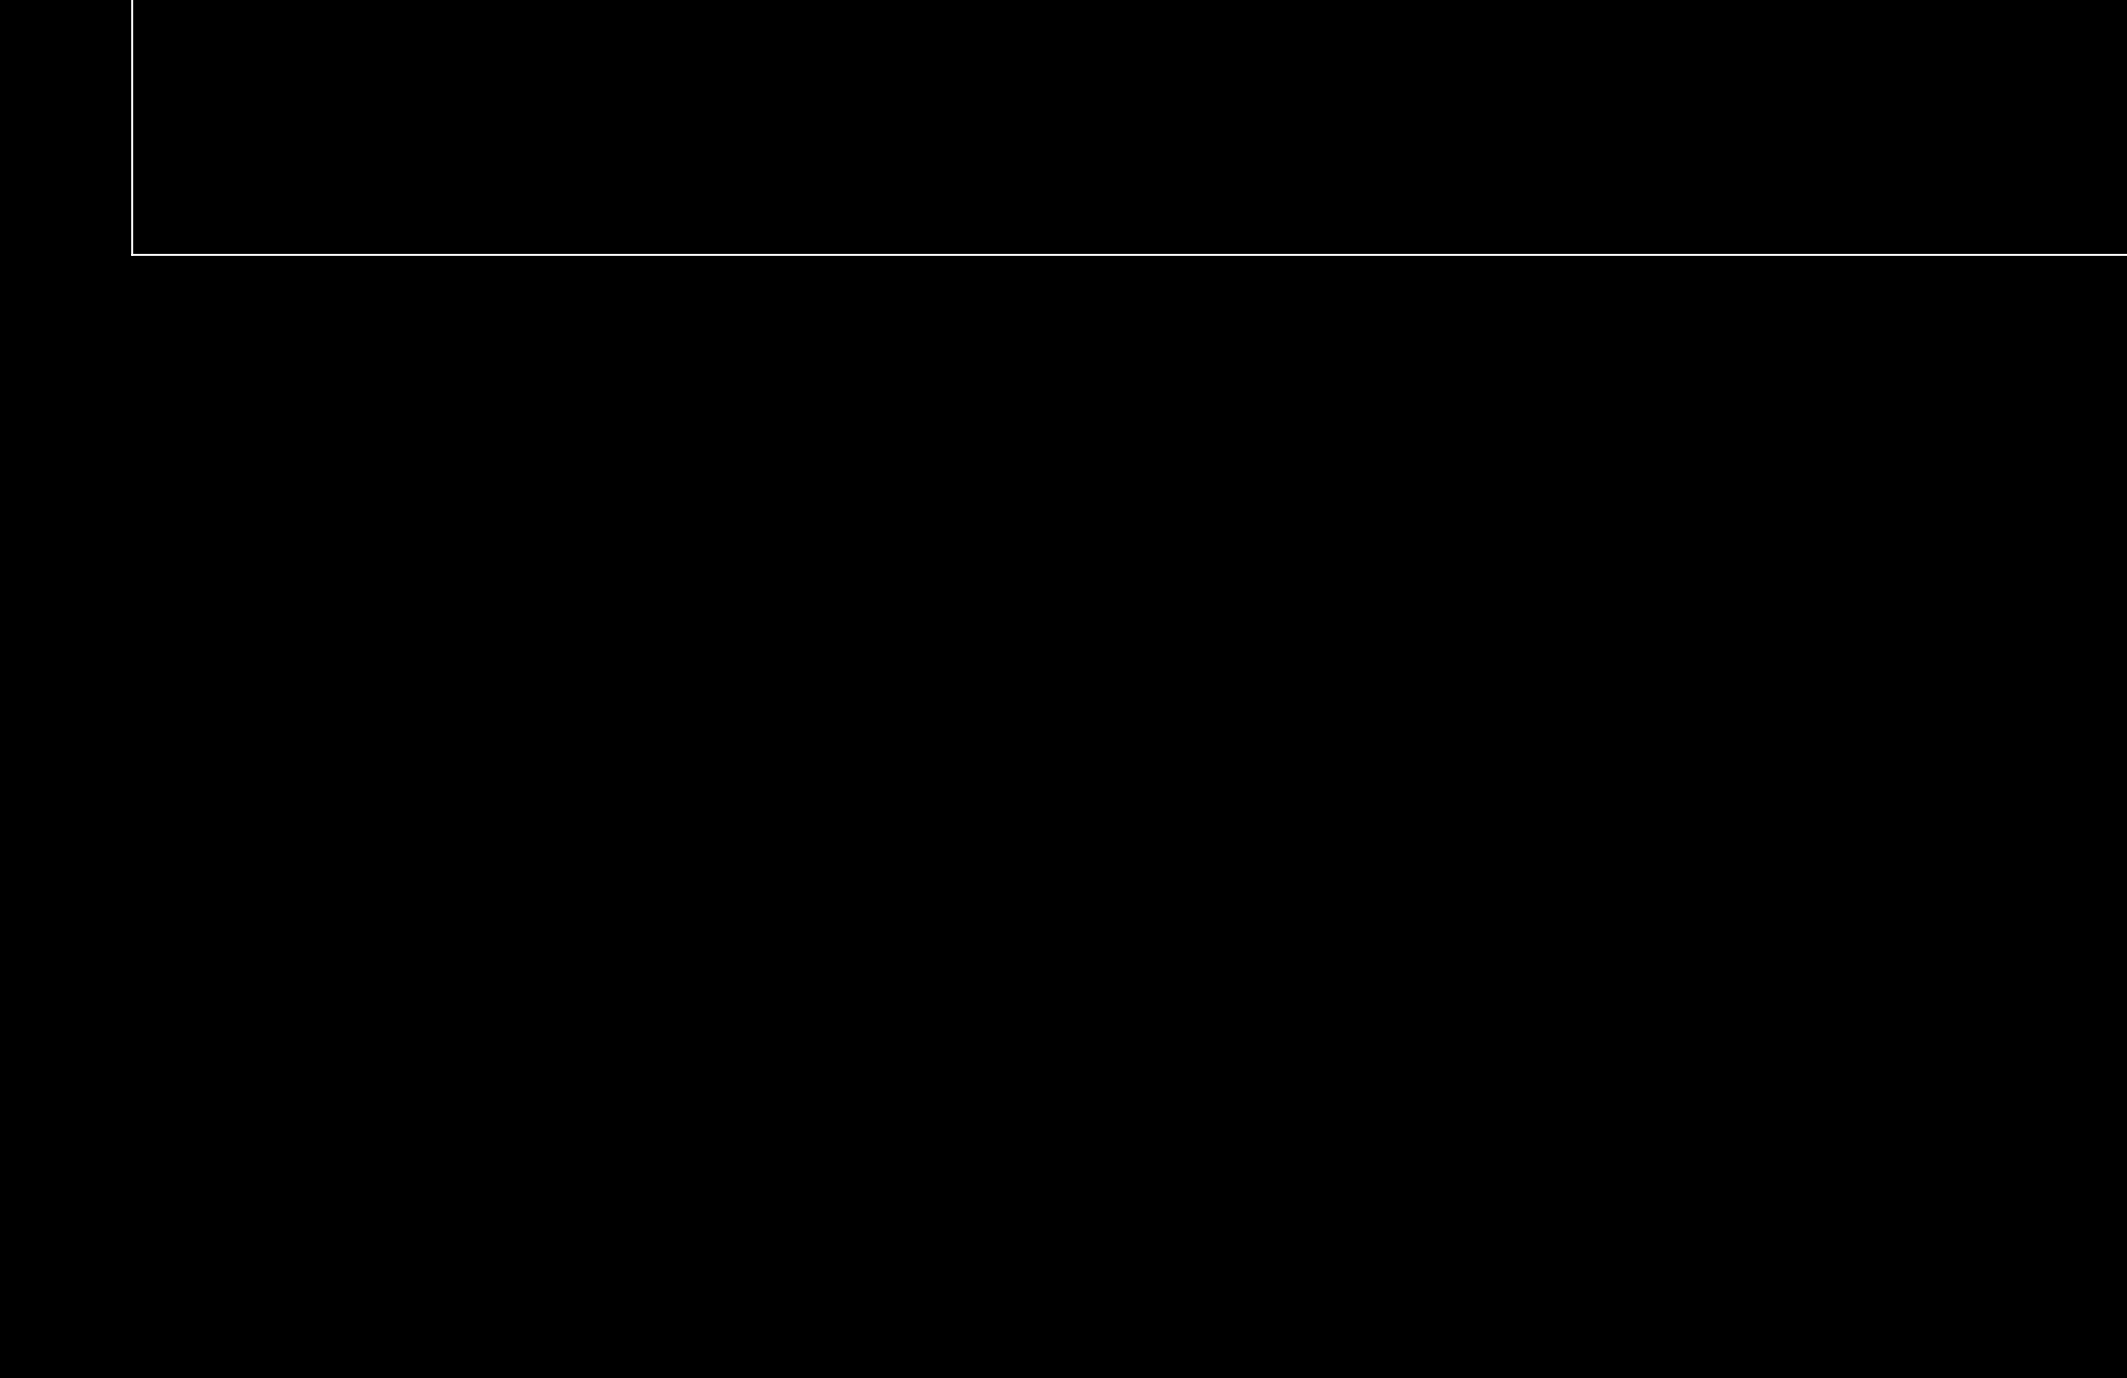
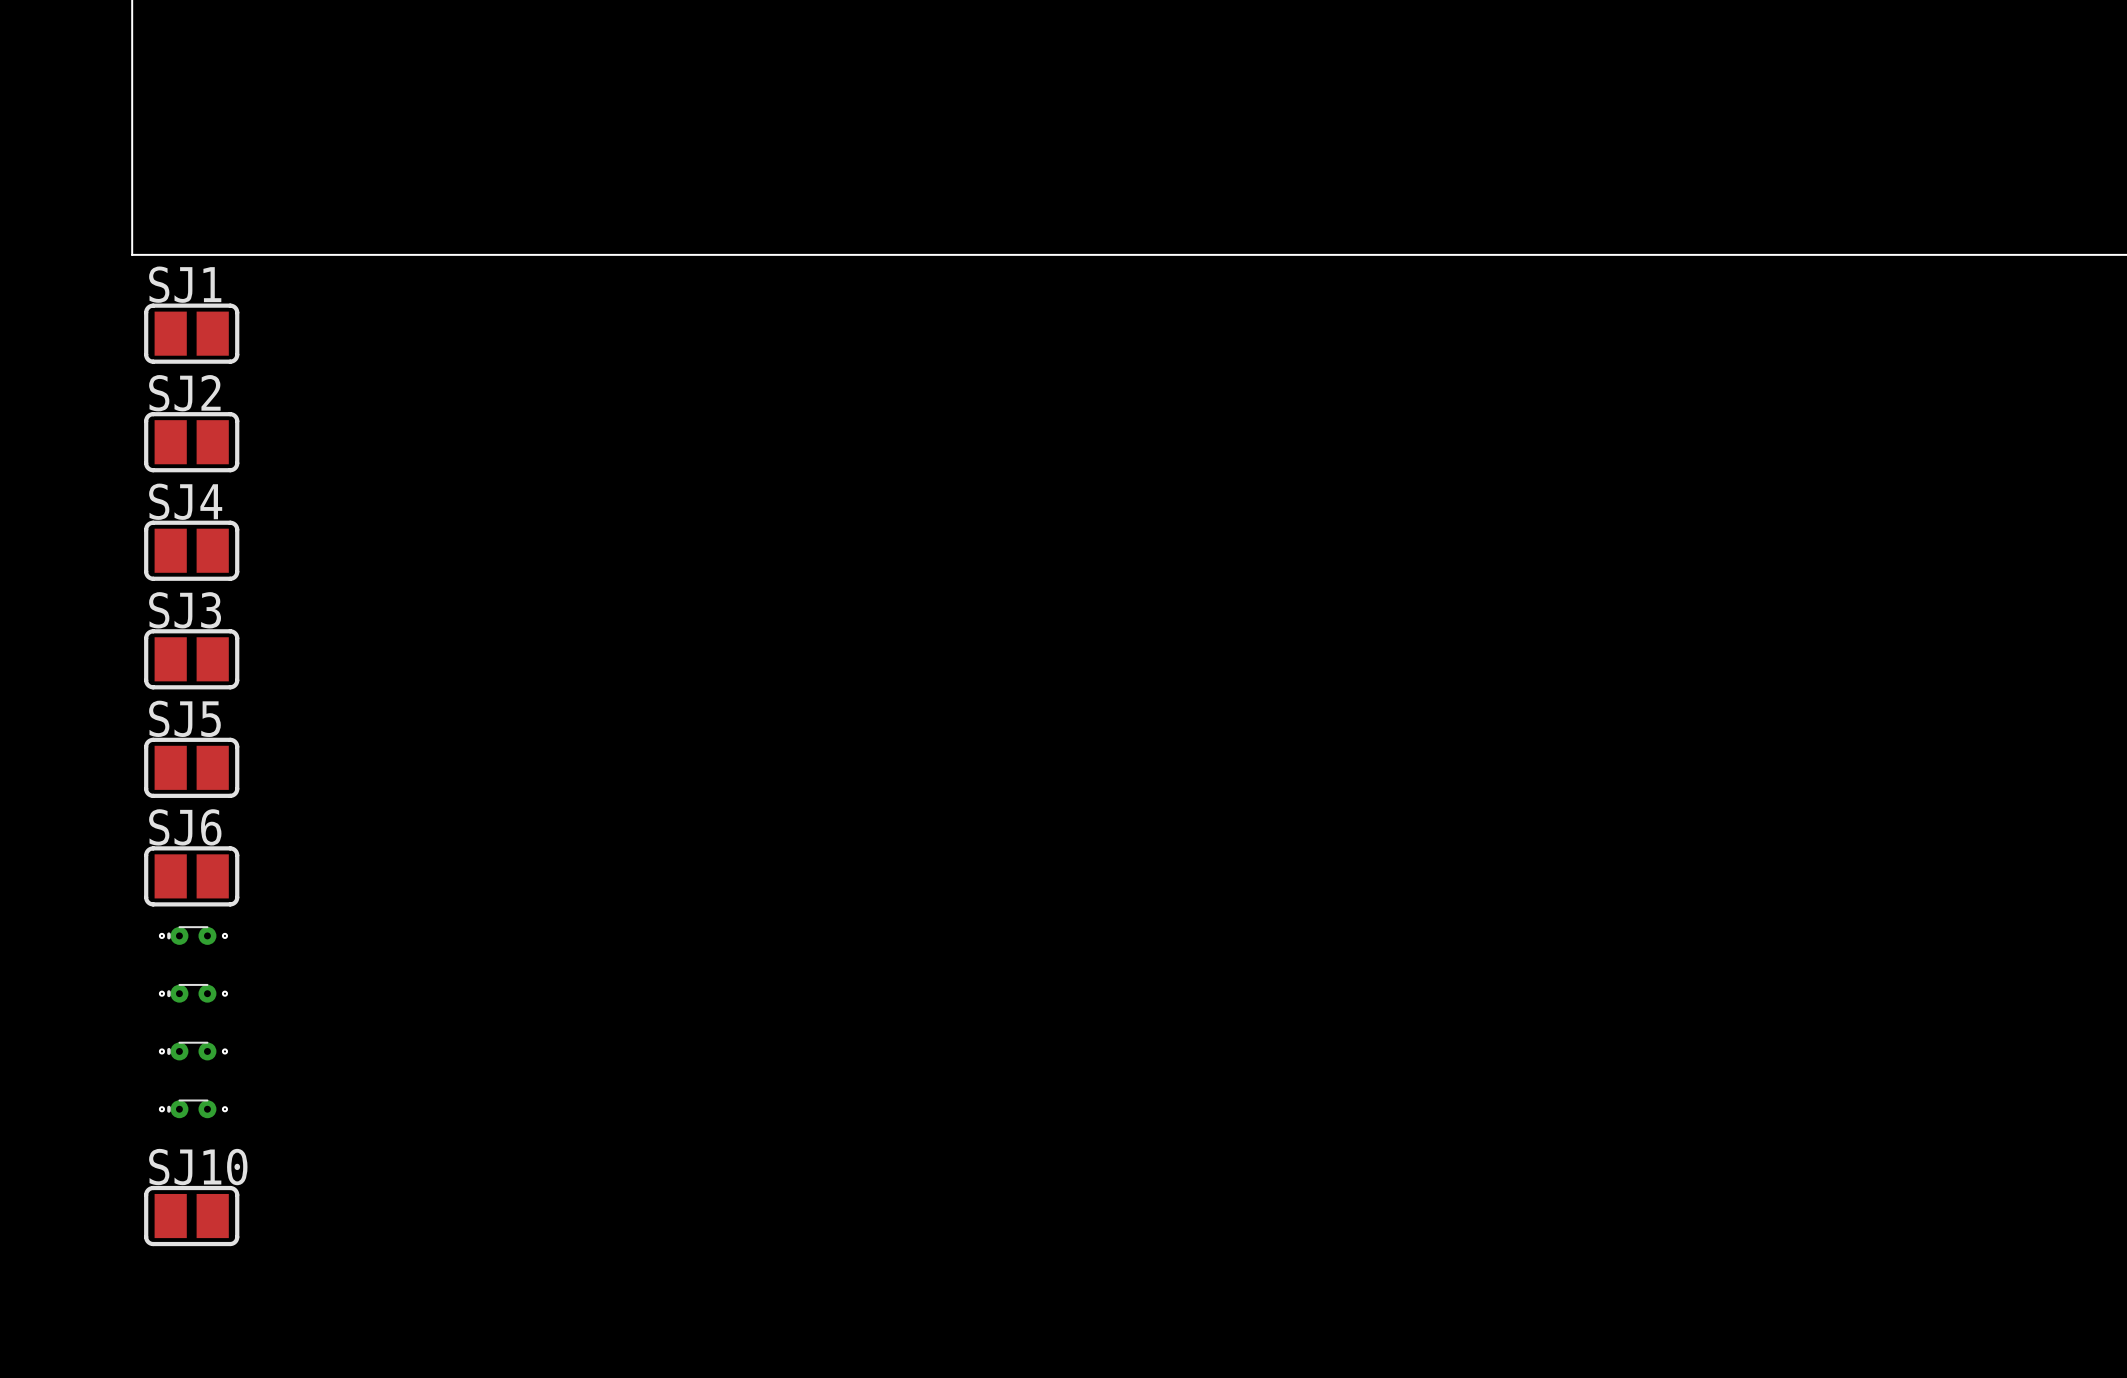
SJ1: none -> (191, 333)
SJ2: none -> (191, 442)
SJ4: none -> (191, 550)
SJ3: none -> (191, 659)
SJ5: none -> (191, 767)
SJ6: none -> (191, 876)
part: none -> (193, 935)
part: none -> (193, 993)
part: none -> (193, 1051)
part: none -> (193, 1109)
SJ10: none -> (191, 1216)

